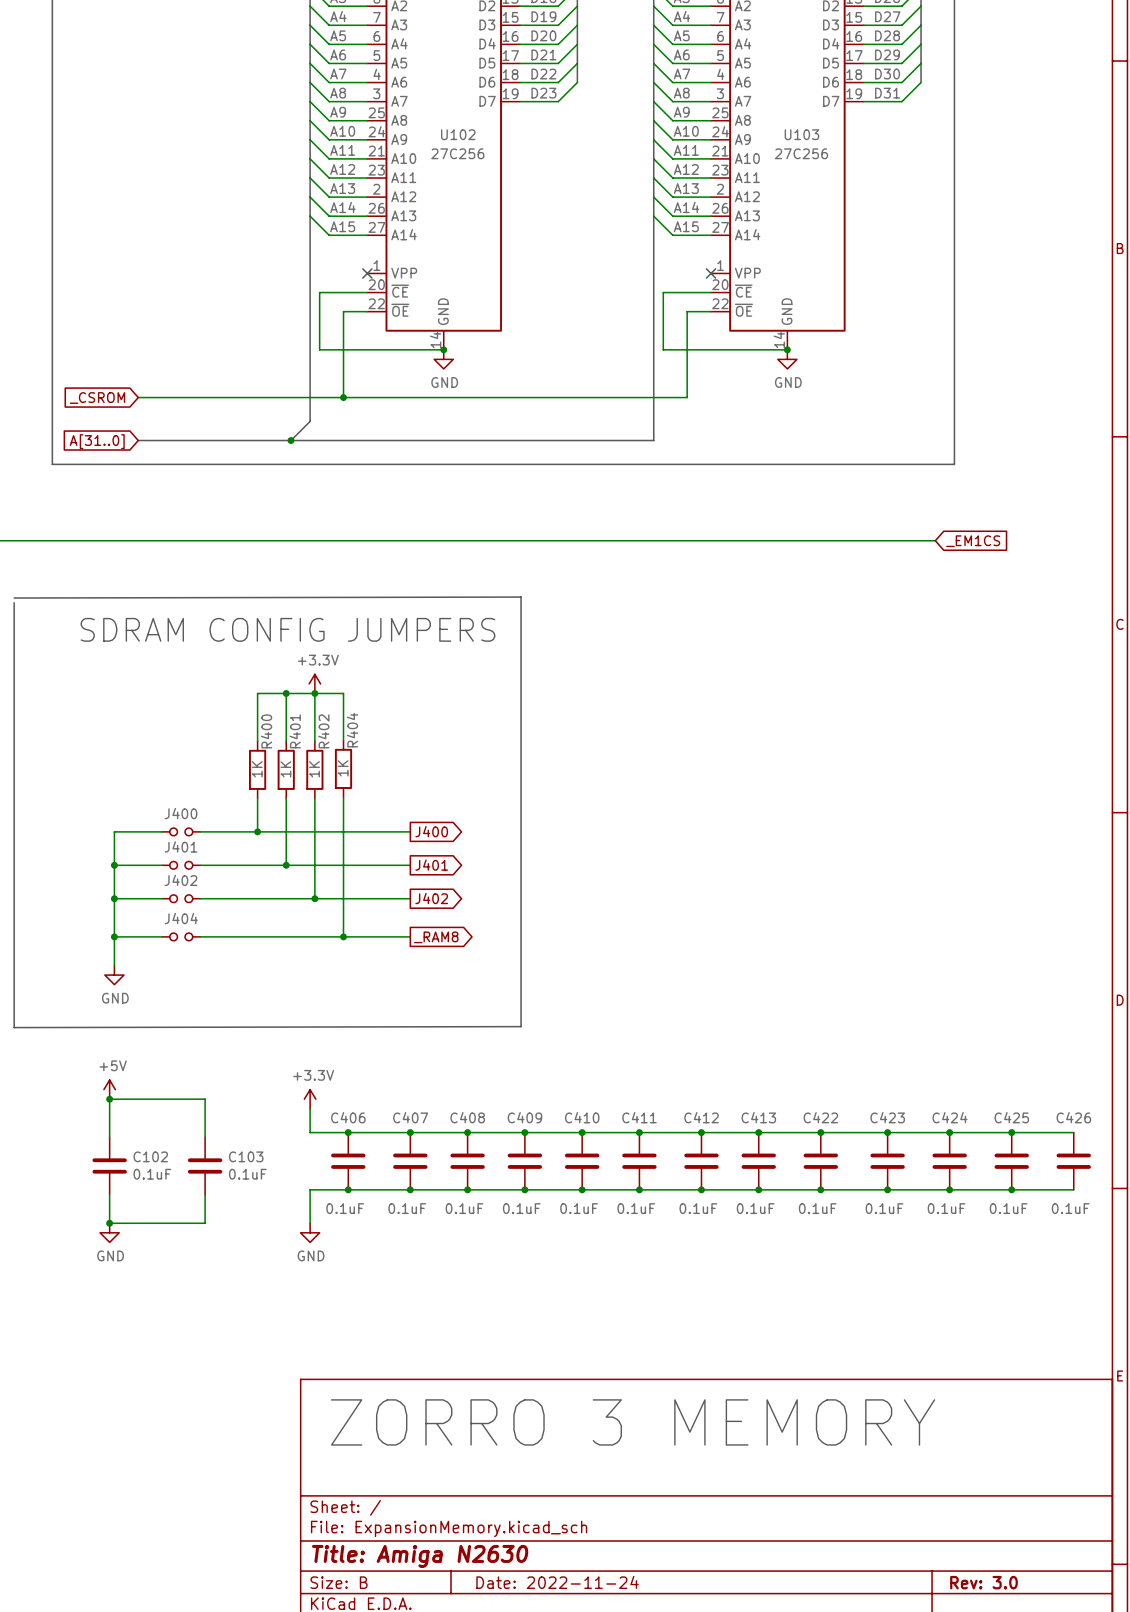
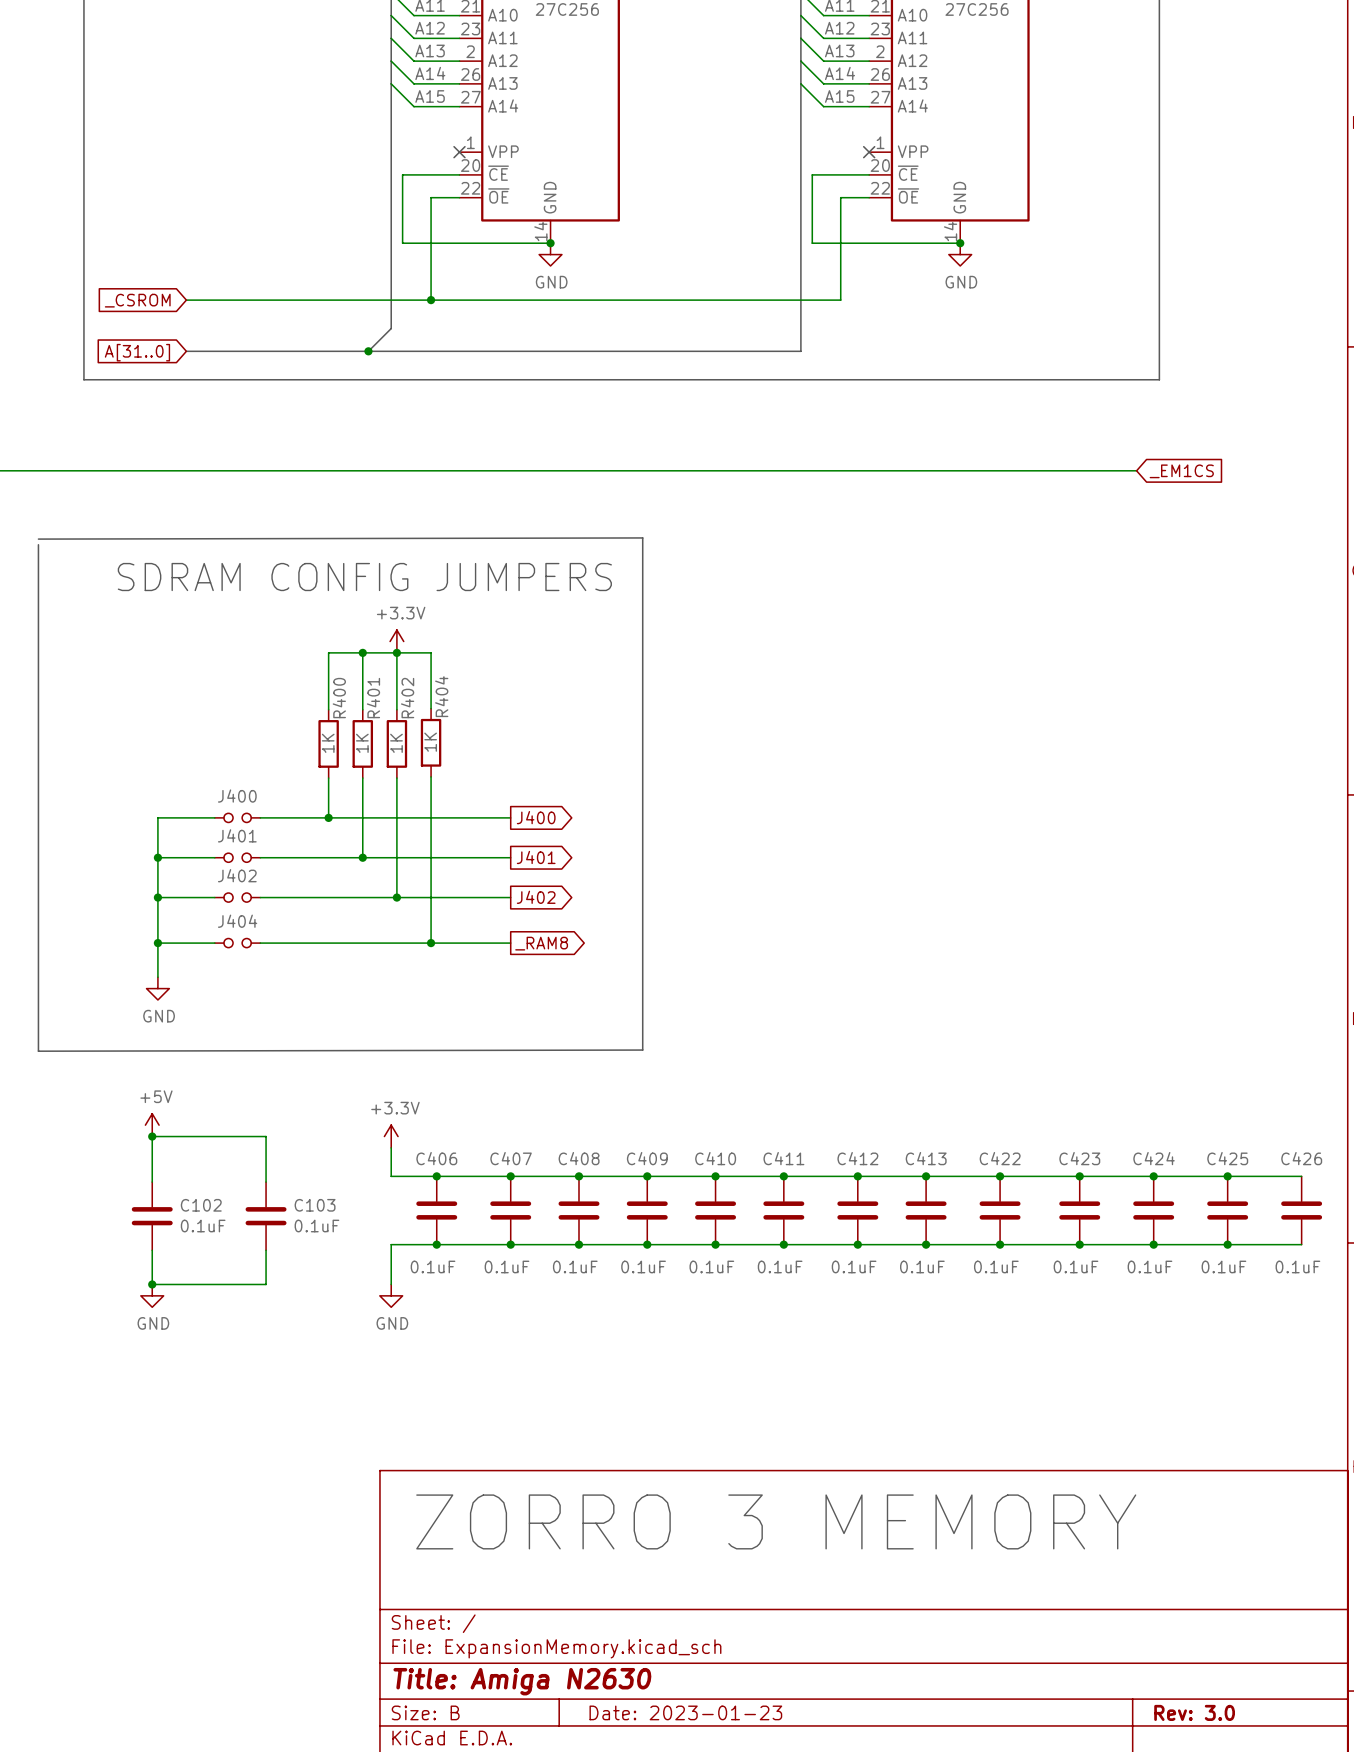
title block: Date: 2022-11-24 (557, 1582) -> Date: 2023-01-23 (685, 1712)

